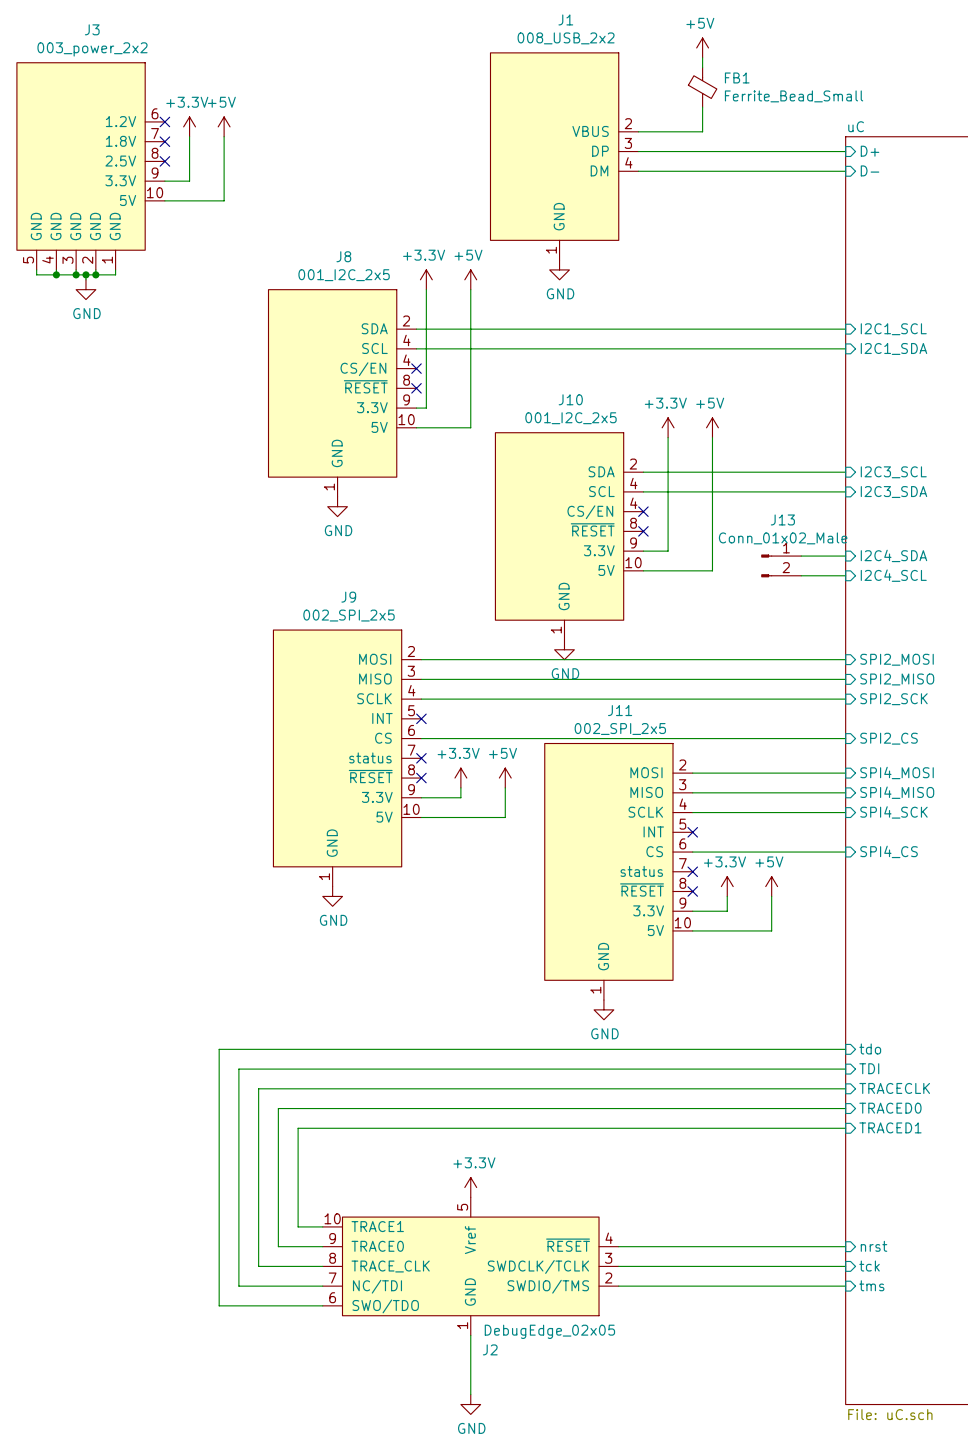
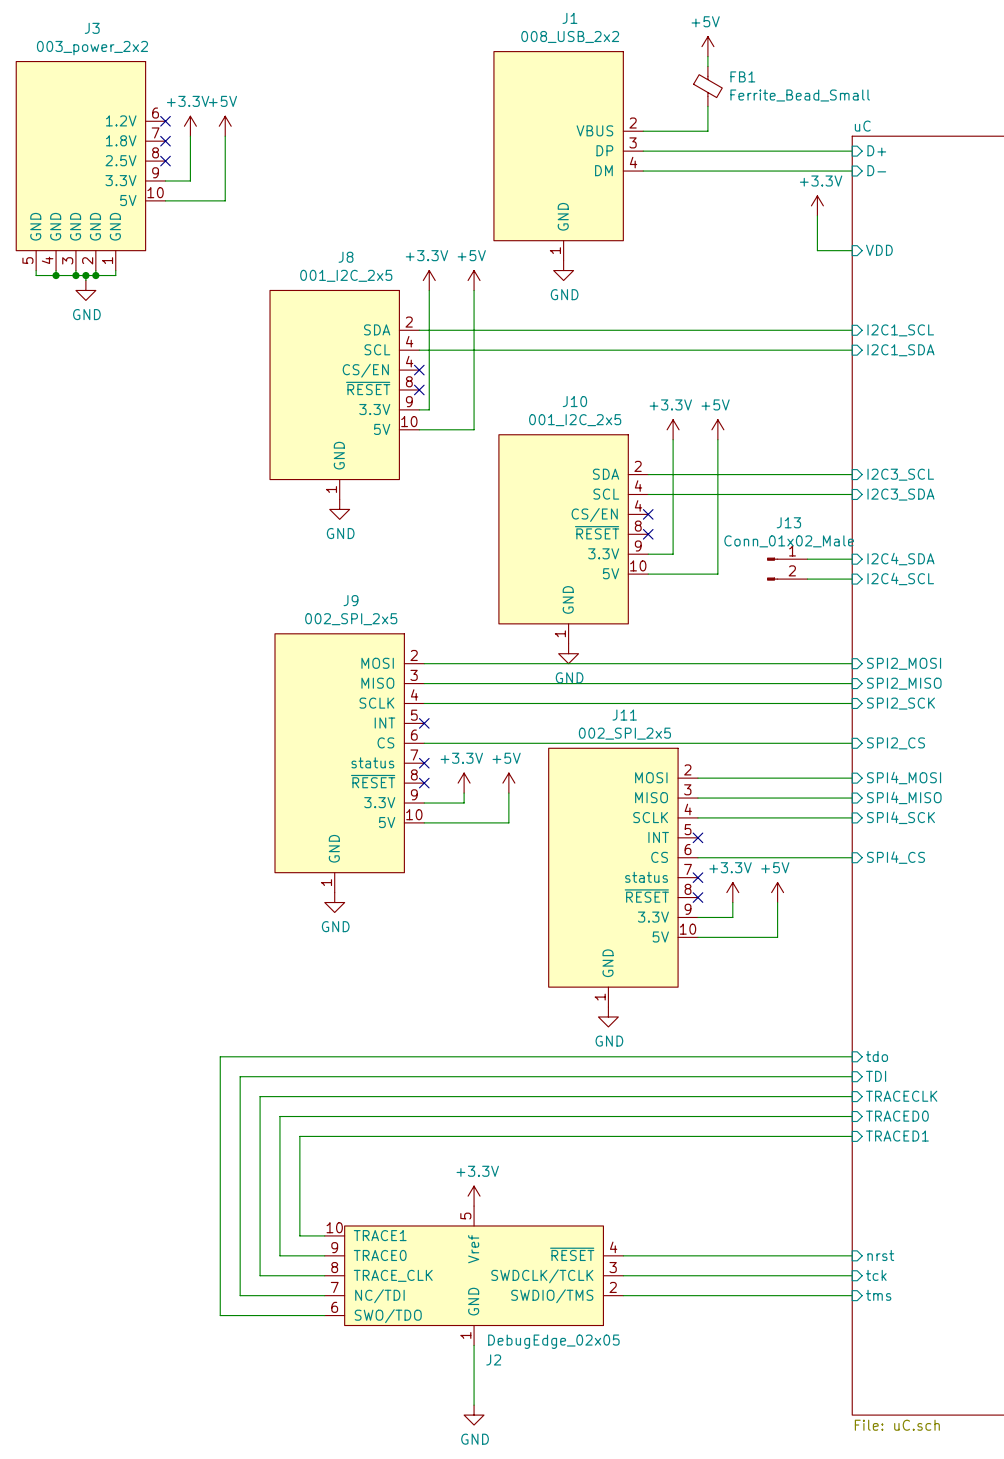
power symbol: none -> +3.3V (817, 205)
wire: none -> (817, 215) (817, 250) (852, 250)
sheet pin: none -> VDD (879, 250)

